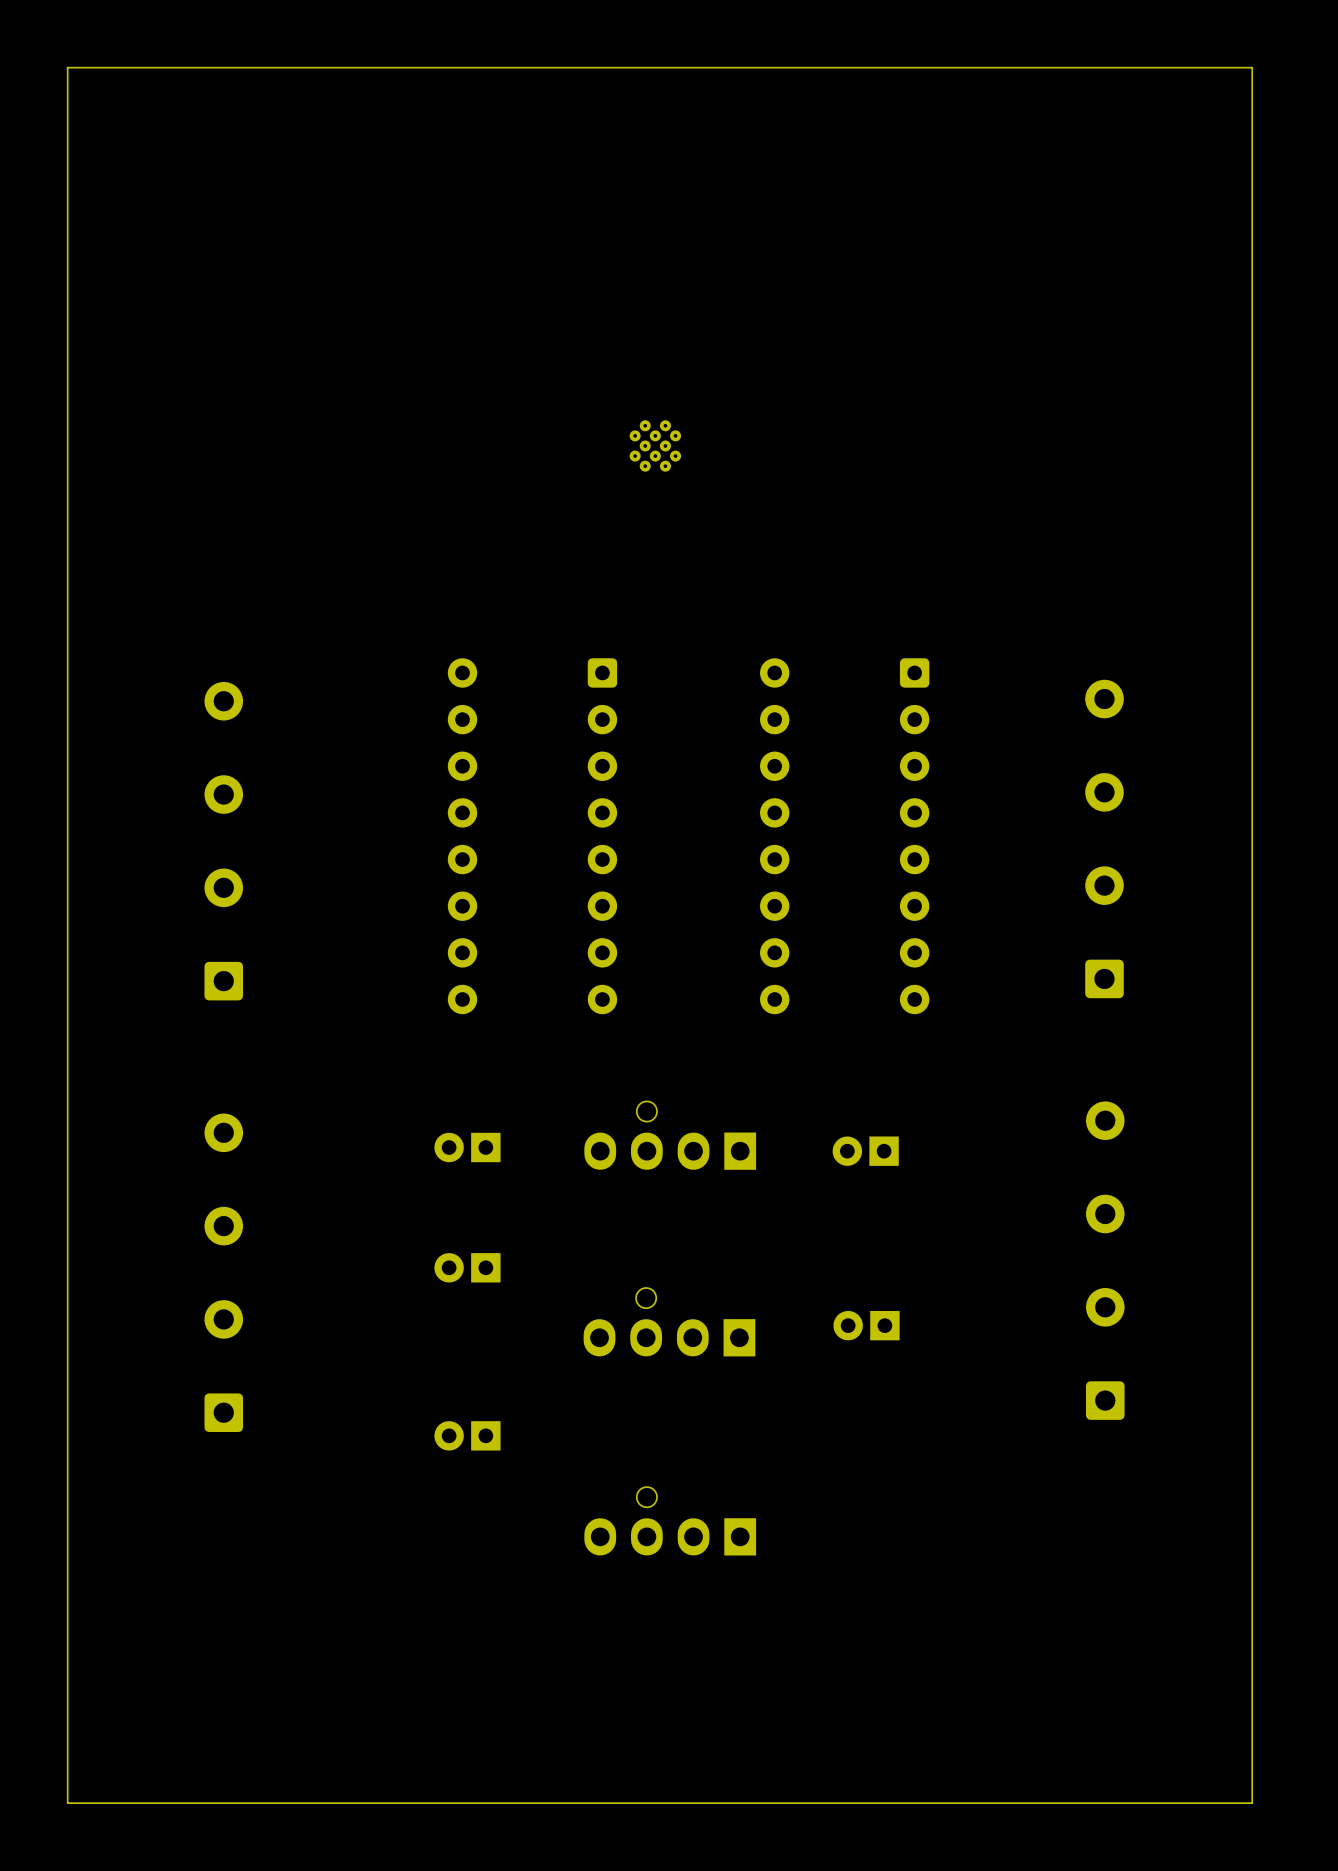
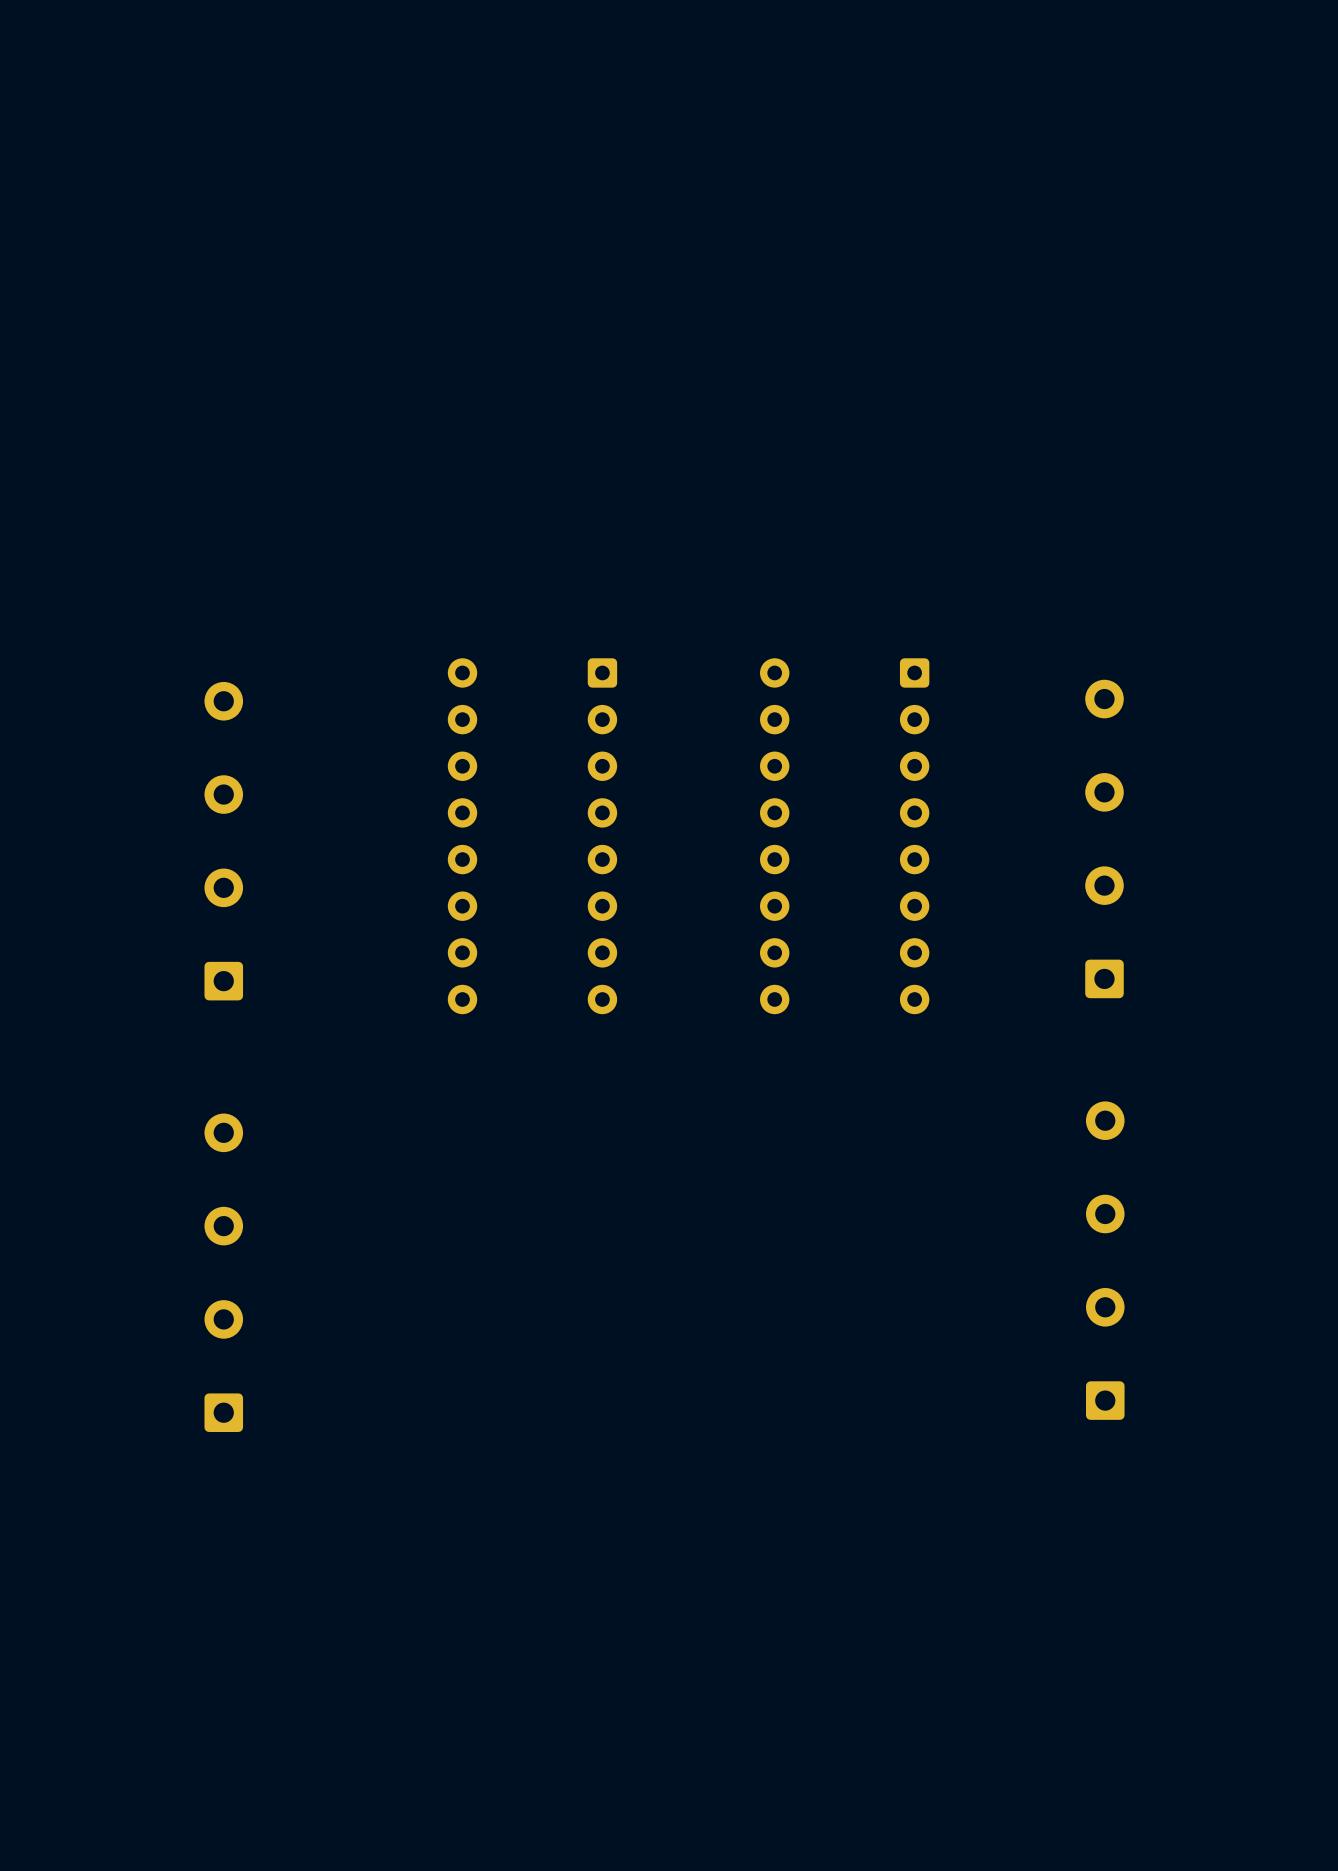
board edge: (1252, 67) (67, 67) (67, 1803) (1252, 1803) (1252, 67) -> none
part: (655, 445) -> none
part: (670, 1135) -> none
part: (467, 1147) -> none
part: (865, 1151) -> none
part: (467, 1267) -> none
part: (669, 1322) -> none
part: (866, 1325) -> none
part: (467, 1435) -> none
part: (670, 1521) -> none

